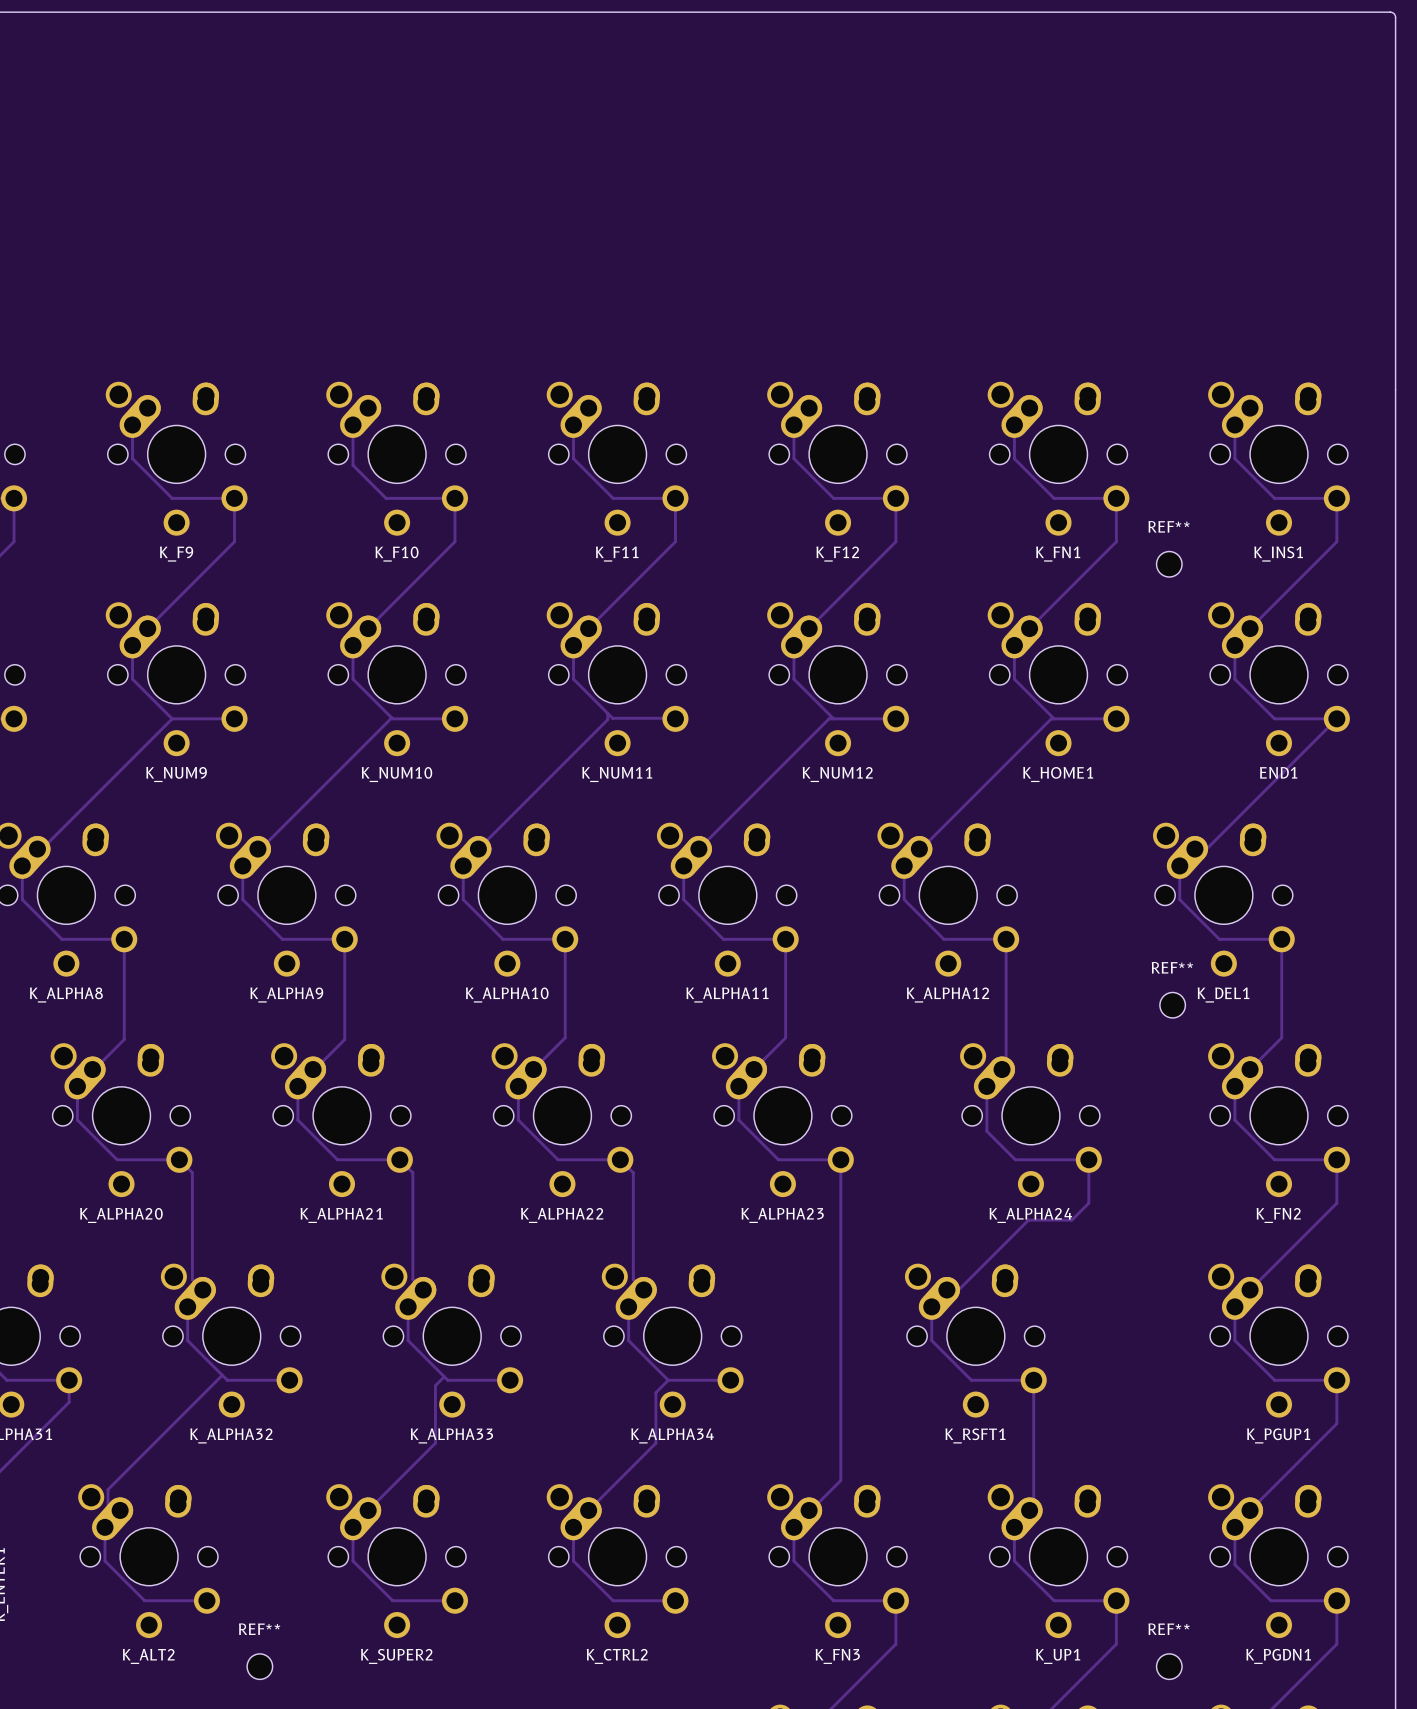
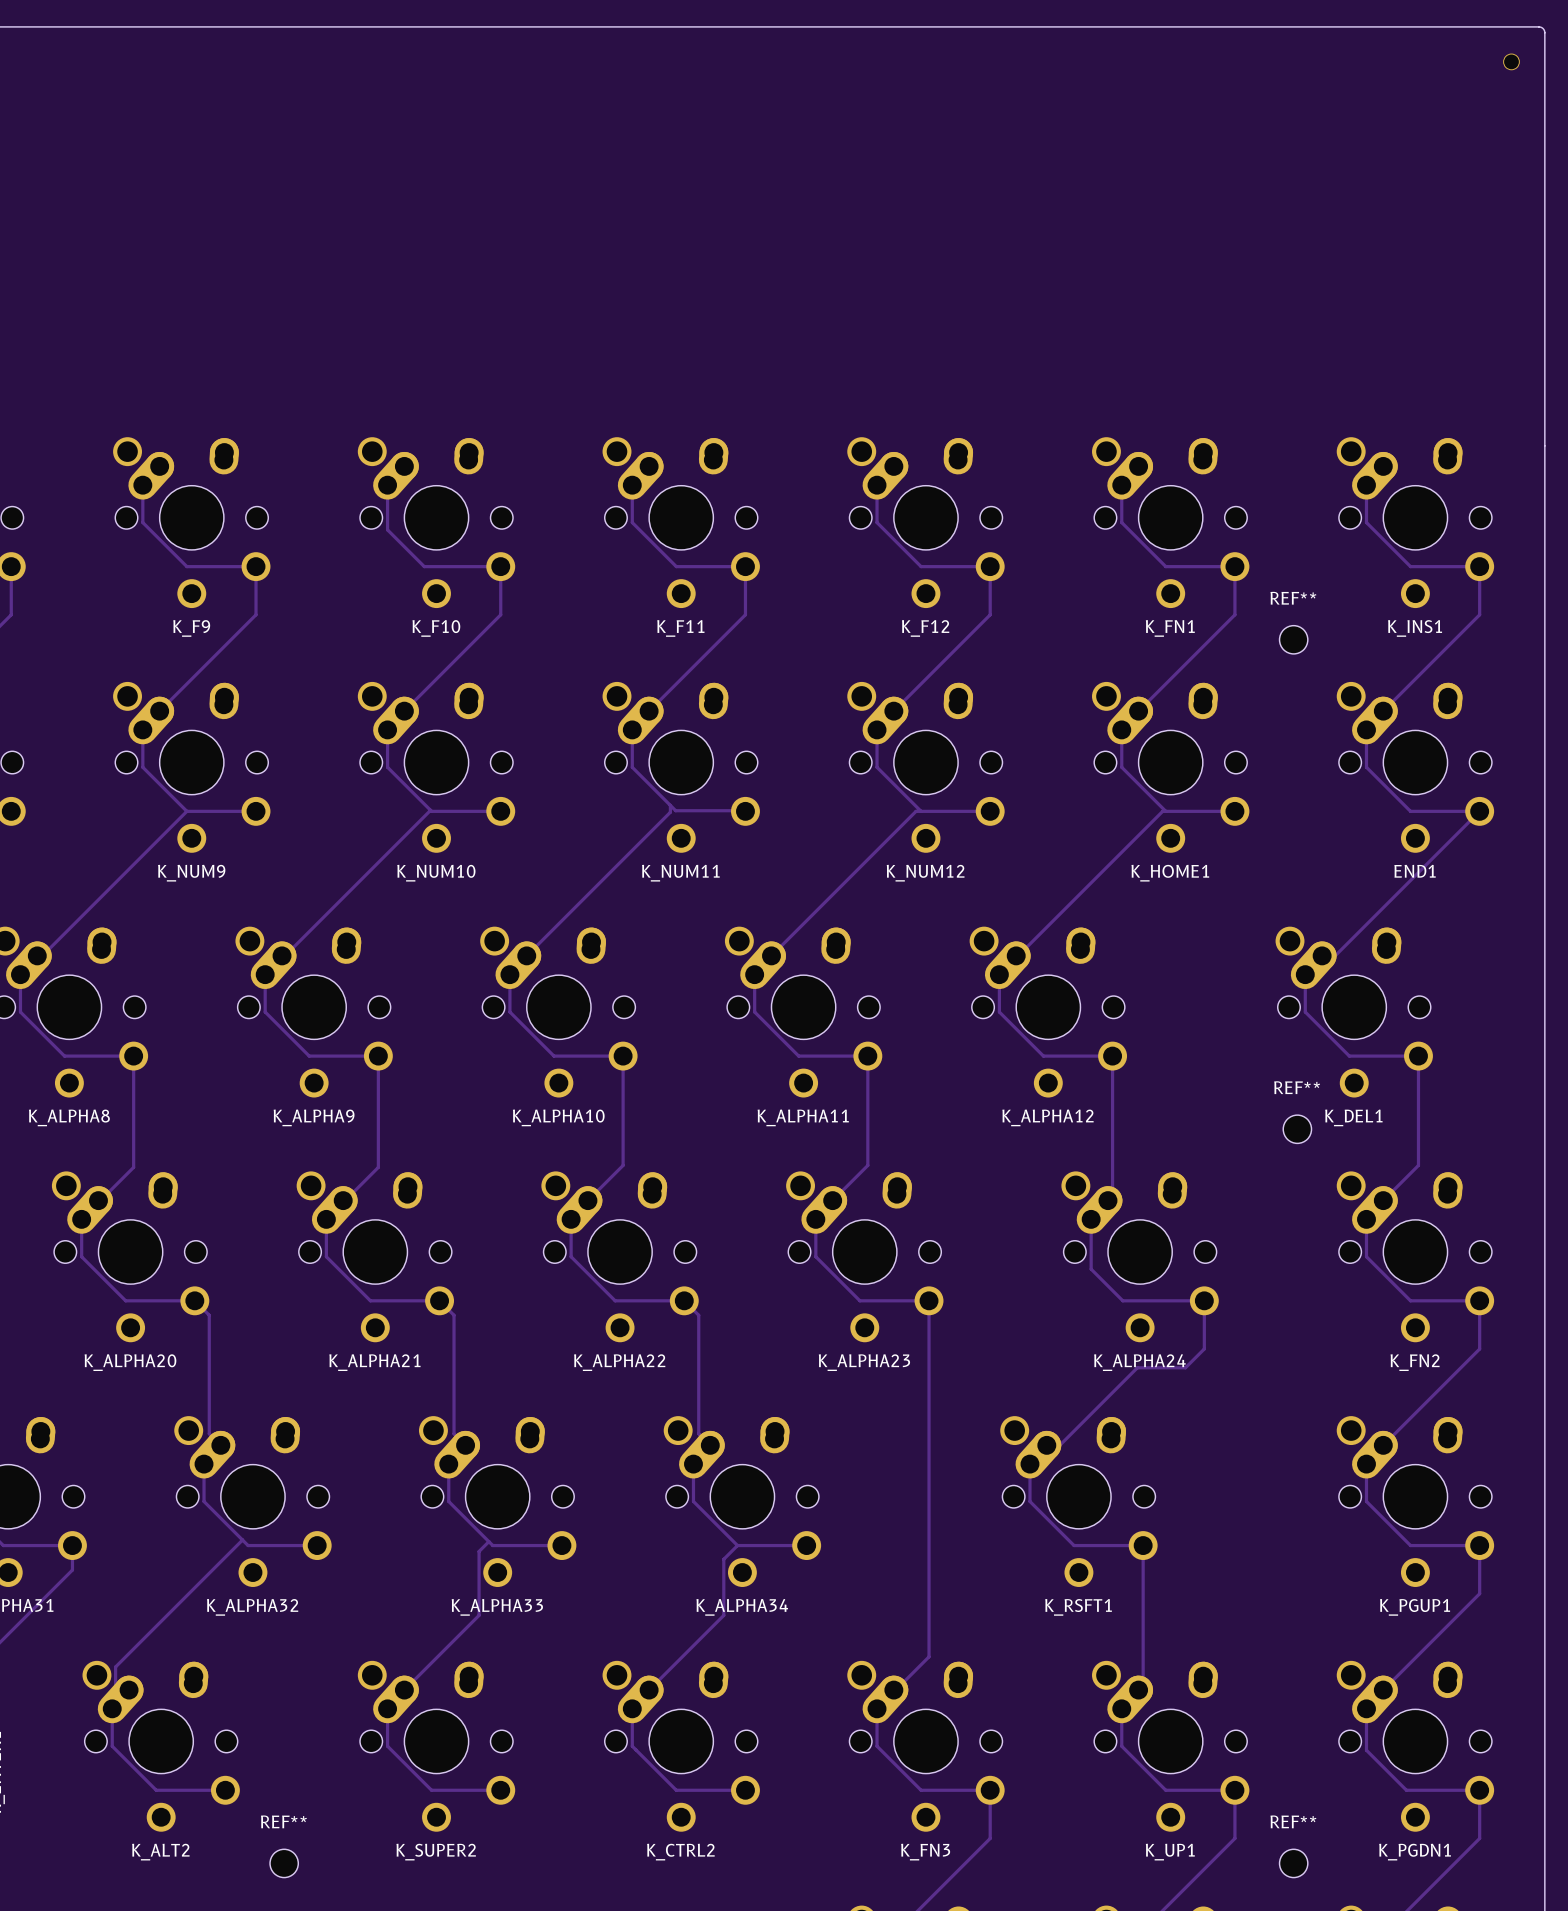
part: none -> (1511, 61)

